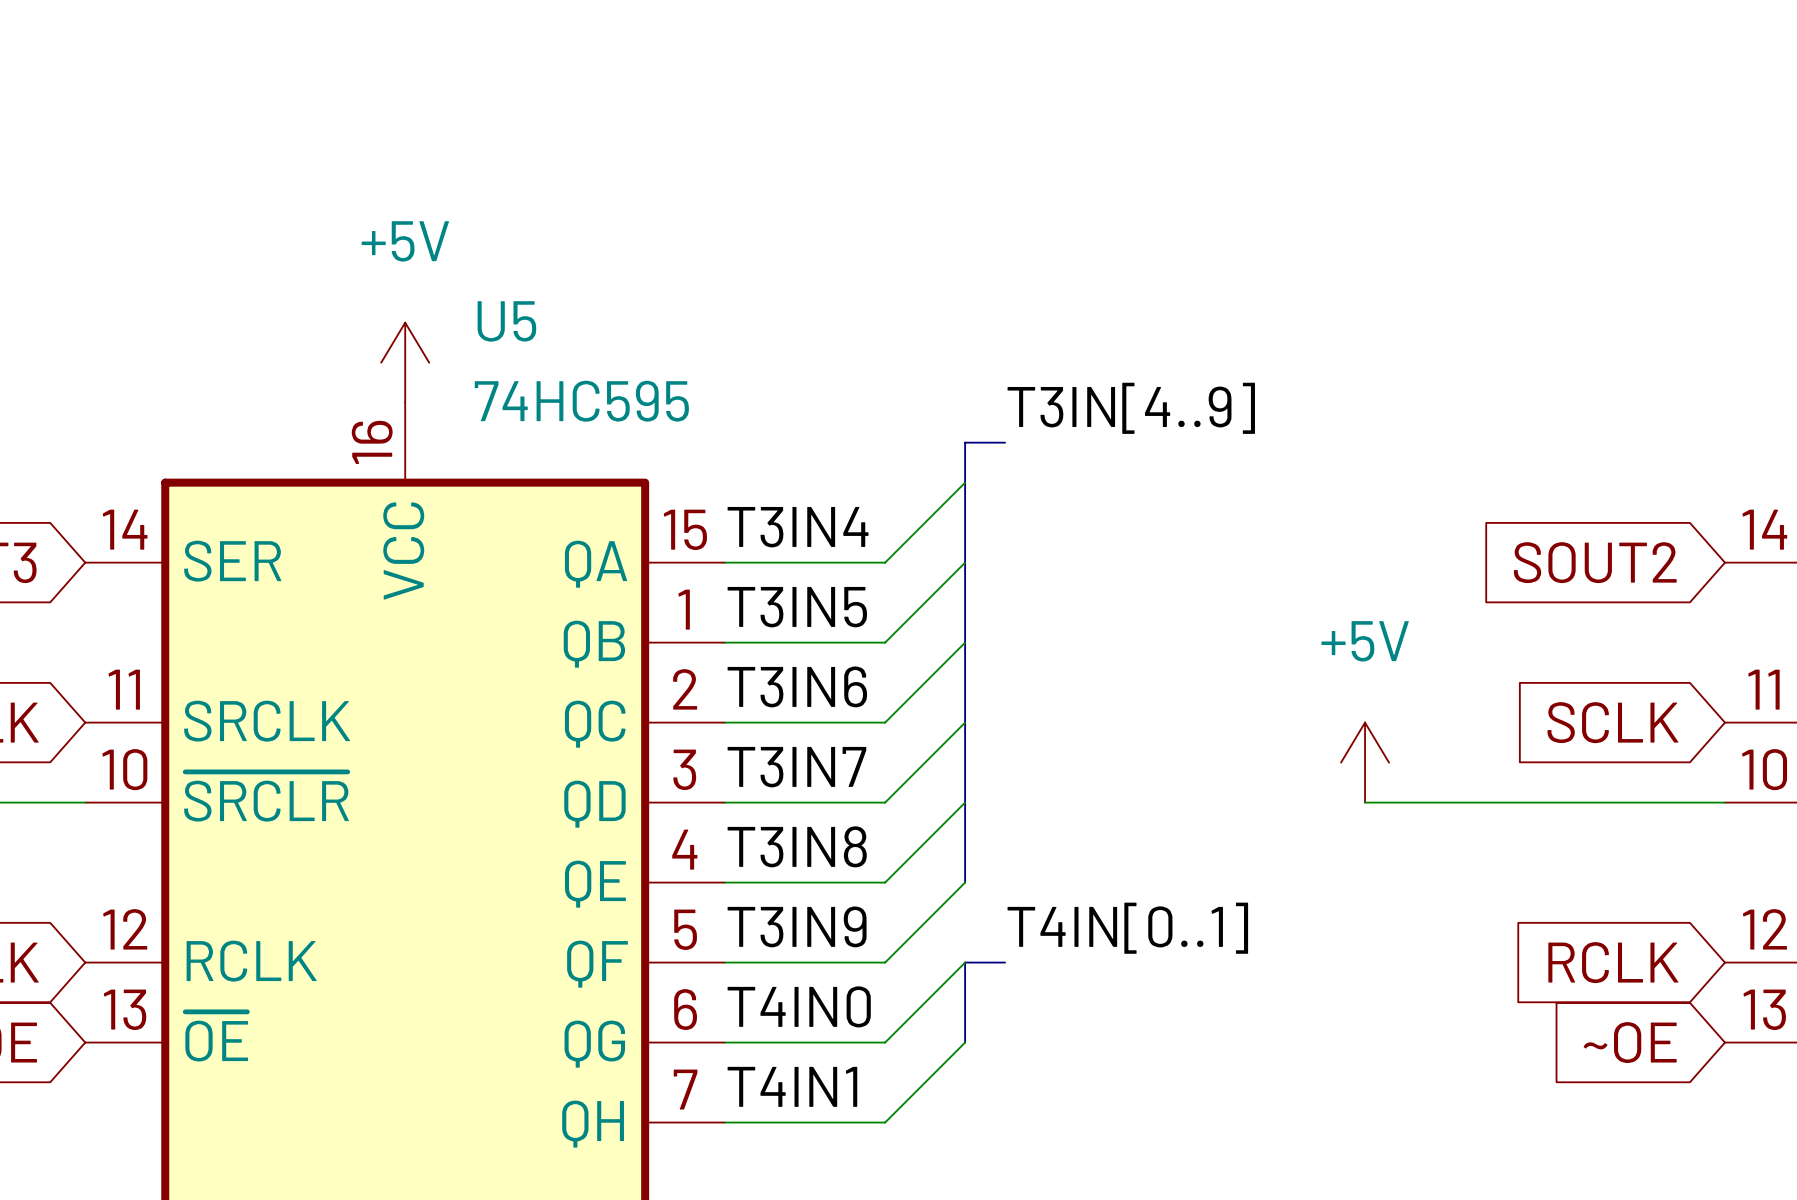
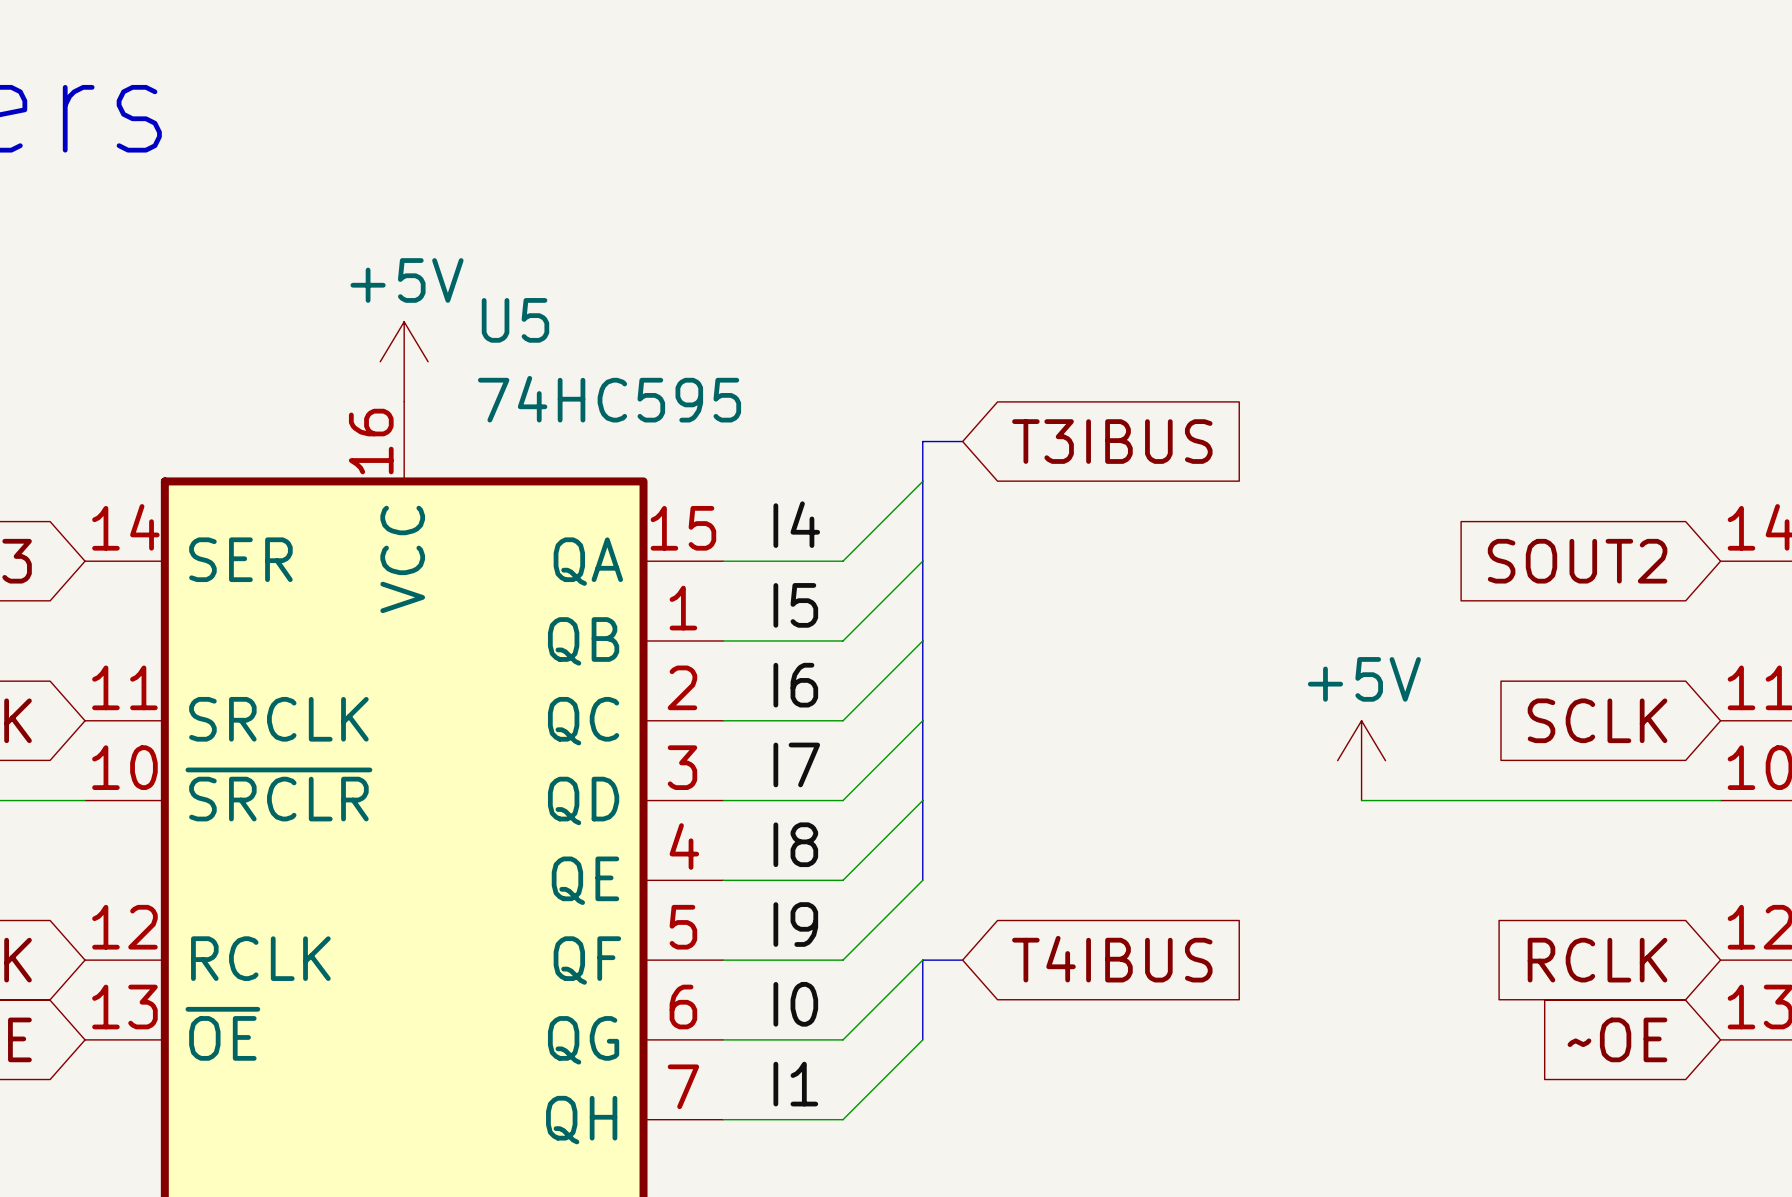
power symbol text position: +5V (405, 241) -> +5V (407, 280)
label: T3IN[4..9] (1131, 408) -> none
bus: (1005, 442) (965, 442) (965, 882) -> (962, 441) (922, 441) (922, 880)
global label: none -> T3IBUS (1112, 441)
wire: (965, 482) (885, 562) (845, 562) -> (922, 481) (842, 561)
label: none -> I4 (796, 524)
label: T3IN4 (798, 527) -> none
wire: (965, 562) (885, 642) (845, 642) -> (922, 561) (842, 640)
label: none -> I5 (795, 605)
label: T3IN5 (797, 607) -> none
power symbol text position: +5V (1365, 641) -> +5V (1364, 679)
wire: (965, 642) (885, 722) (845, 722) -> (922, 640) (842, 720)
label: none -> I6 (795, 685)
label: T3IN6 (797, 686) -> none
wire: (965, 722) (885, 802) (845, 802) -> (922, 720) (842, 800)
label: none -> I7 (796, 764)
label: T3IN7 (796, 767) -> none
wire: (965, 802) (885, 882) (845, 882) -> (922, 800) (842, 880)
label: none -> I8 (795, 844)
label: T3IN8 (797, 846) -> none
wire: (965, 882) (885, 962) (845, 962) -> (922, 880) (842, 960)
label: none -> I9 (795, 924)
label: T3IN9 (797, 926) -> none
label: T4IN[0..1] (1127, 928) -> none
wire: (965, 962) (885, 1042) (845, 1042) -> (922, 960) (842, 1039)
bus: (1005, 962) (965, 962) (965, 1042) -> (962, 960) (922, 960) (922, 1039)
global label: none -> T4IBUS (1112, 959)
label: none -> I0 (795, 1004)
label: T4IN0 (799, 1006) -> none
wire: (965, 1042) (885, 1122) (845, 1122) -> (922, 1039) (842, 1119)
label: none -> I1 (795, 1084)
label: T4IN1 (792, 1086) -> none

